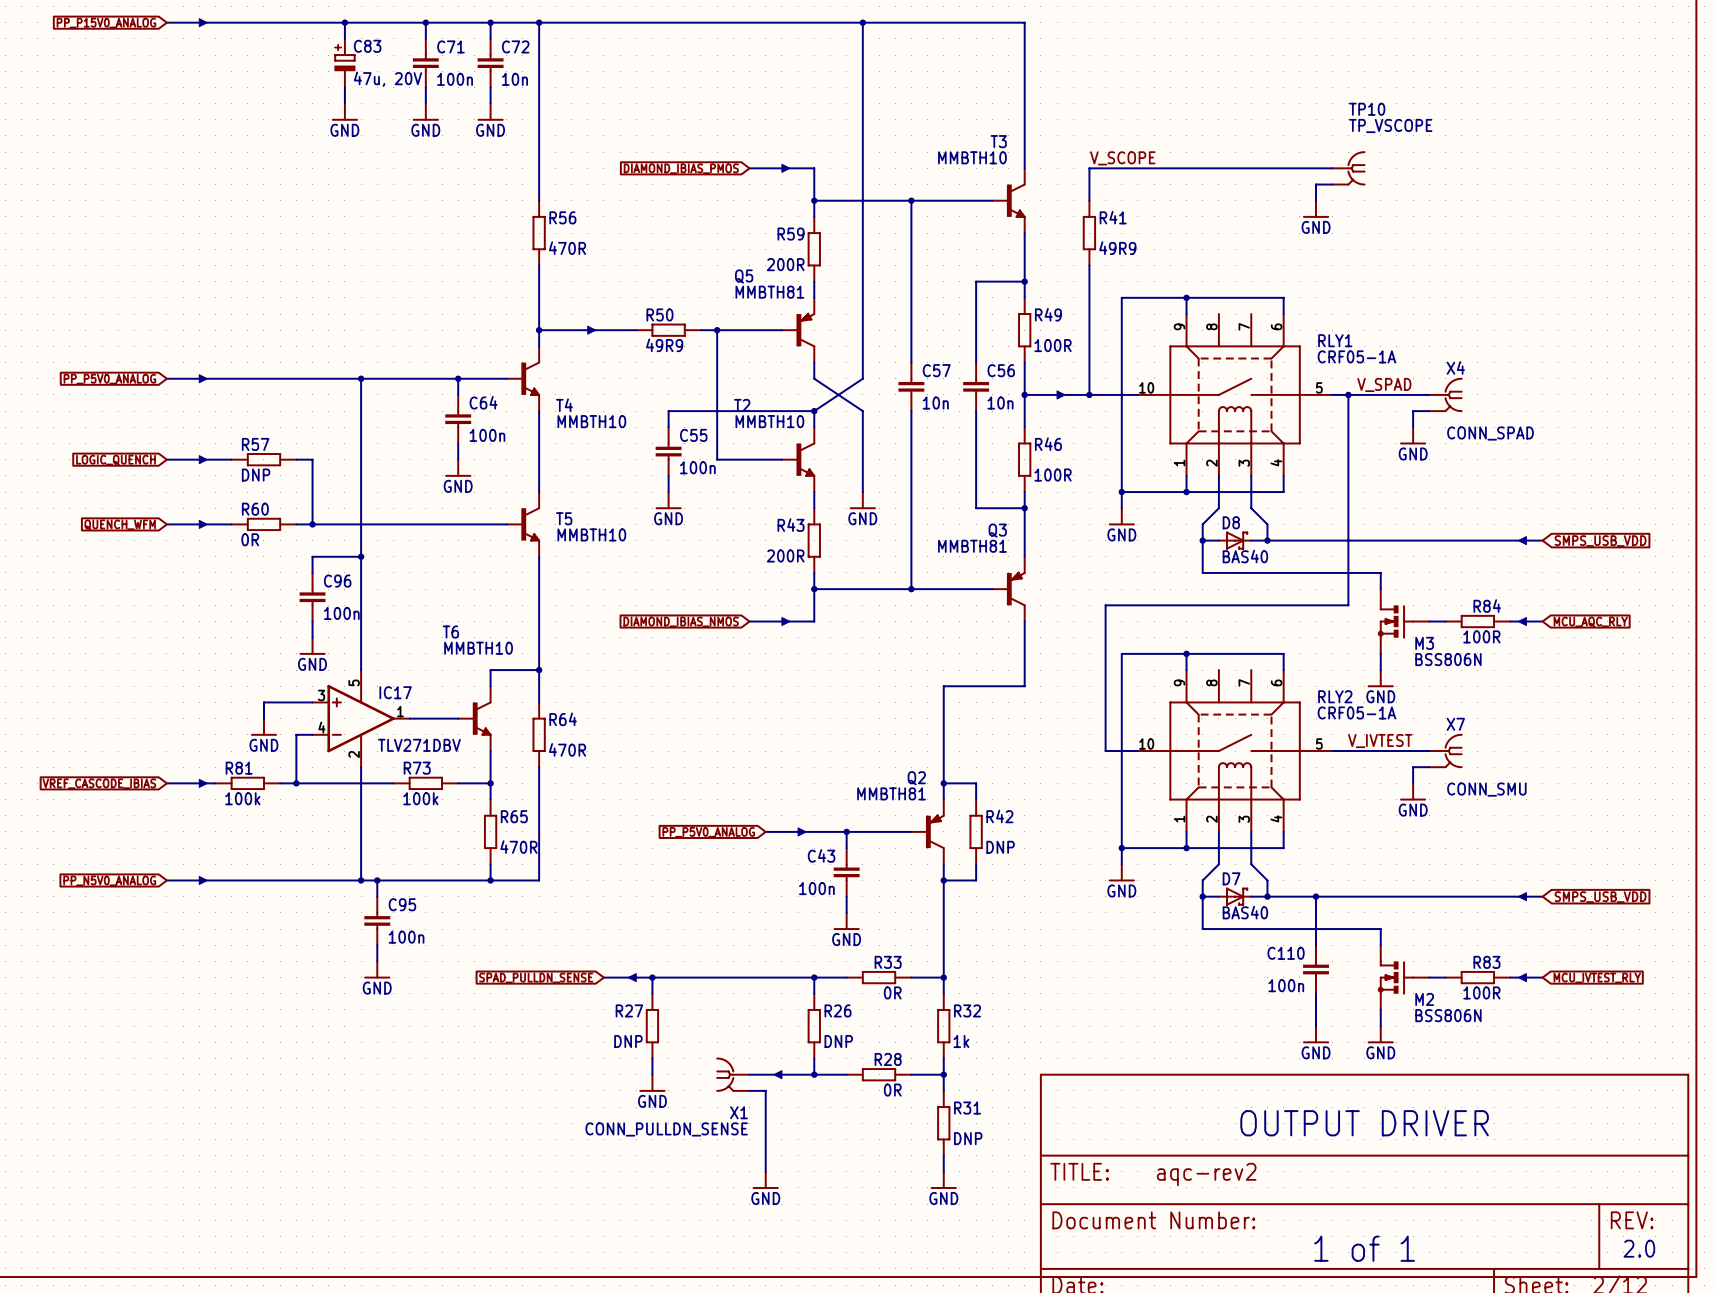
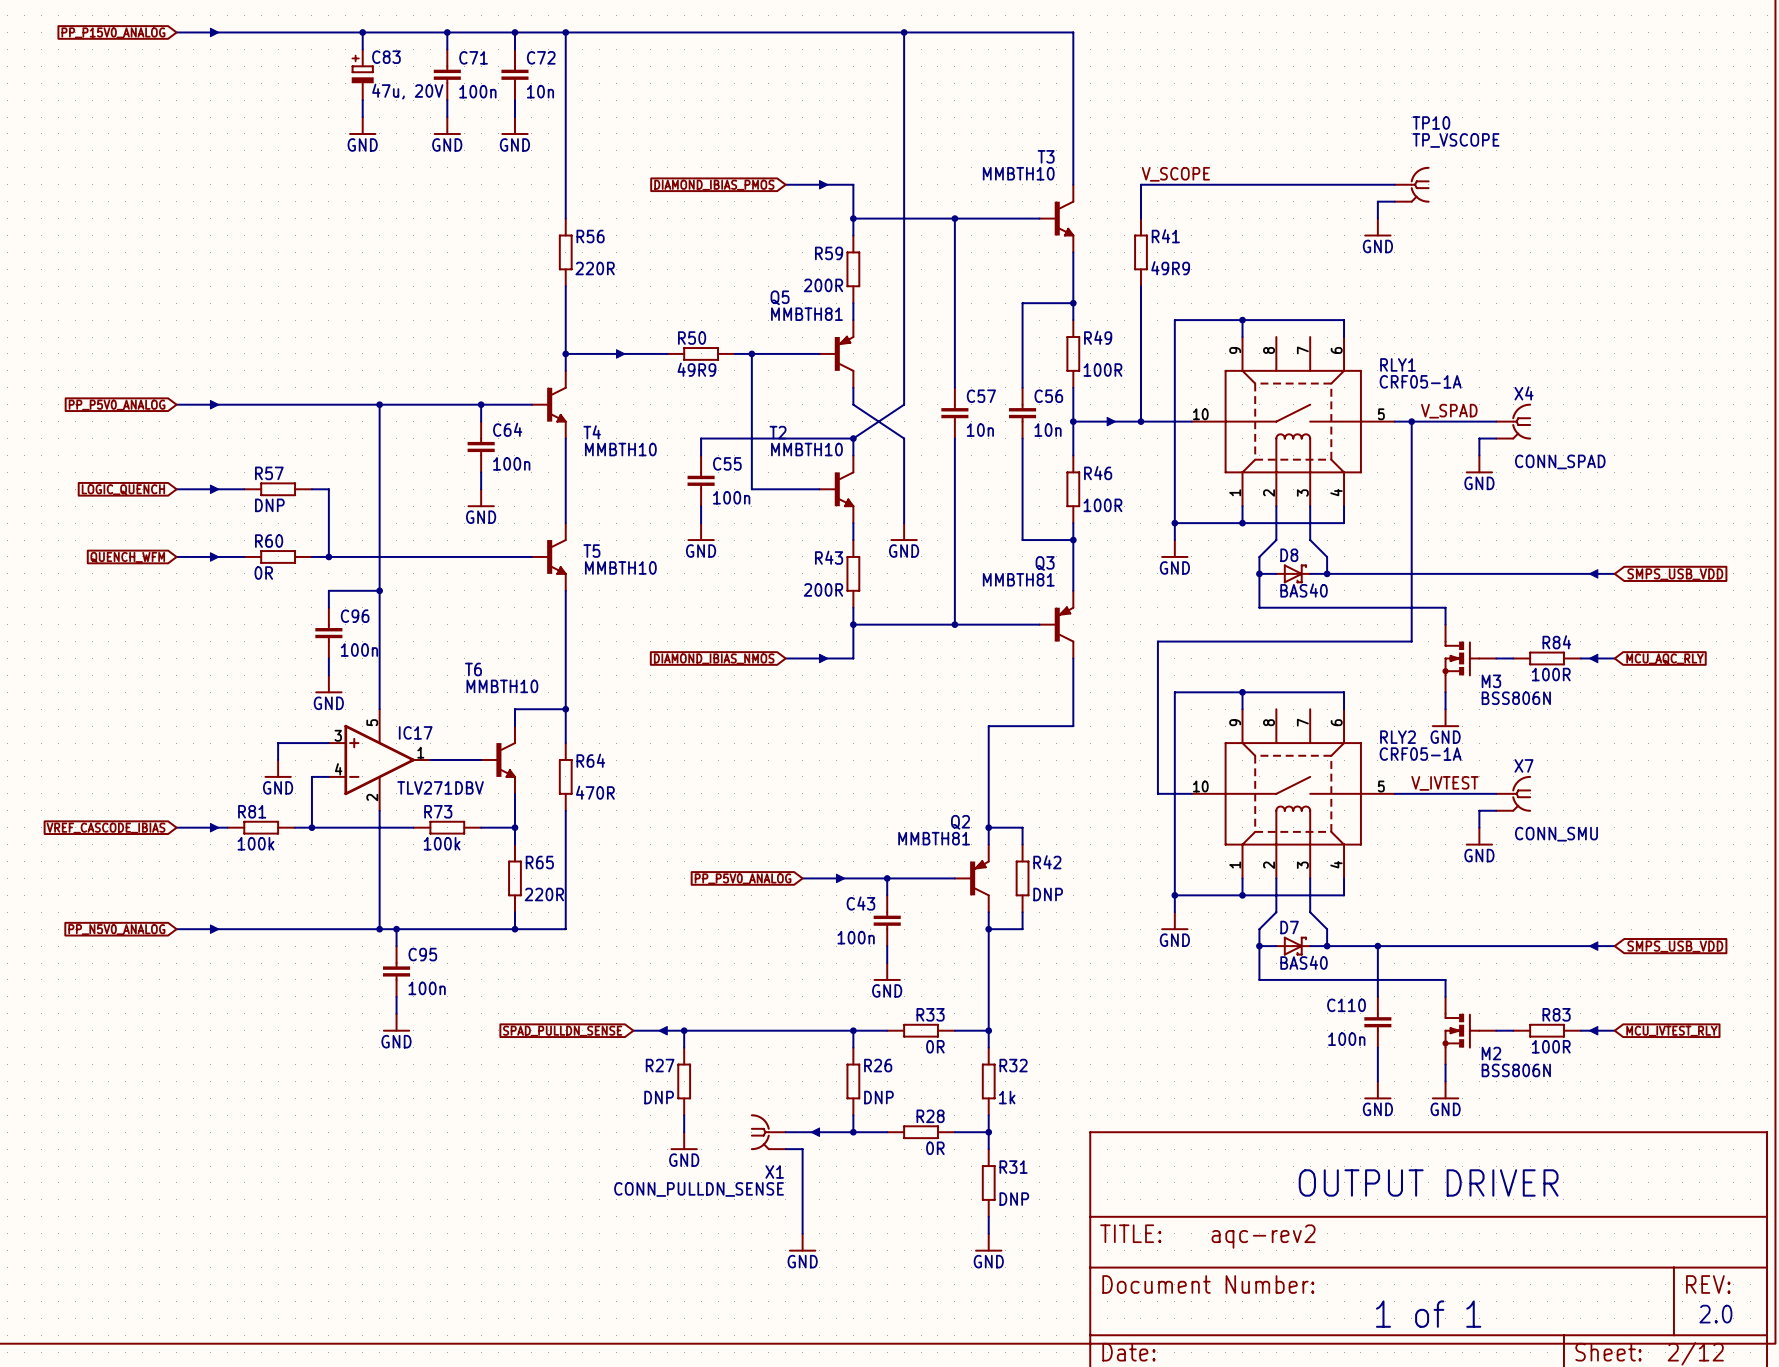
R56 value: 470R (567, 248) -> 220R (595, 268)
R65 value: 470R (518, 847) -> 220R (544, 894)

